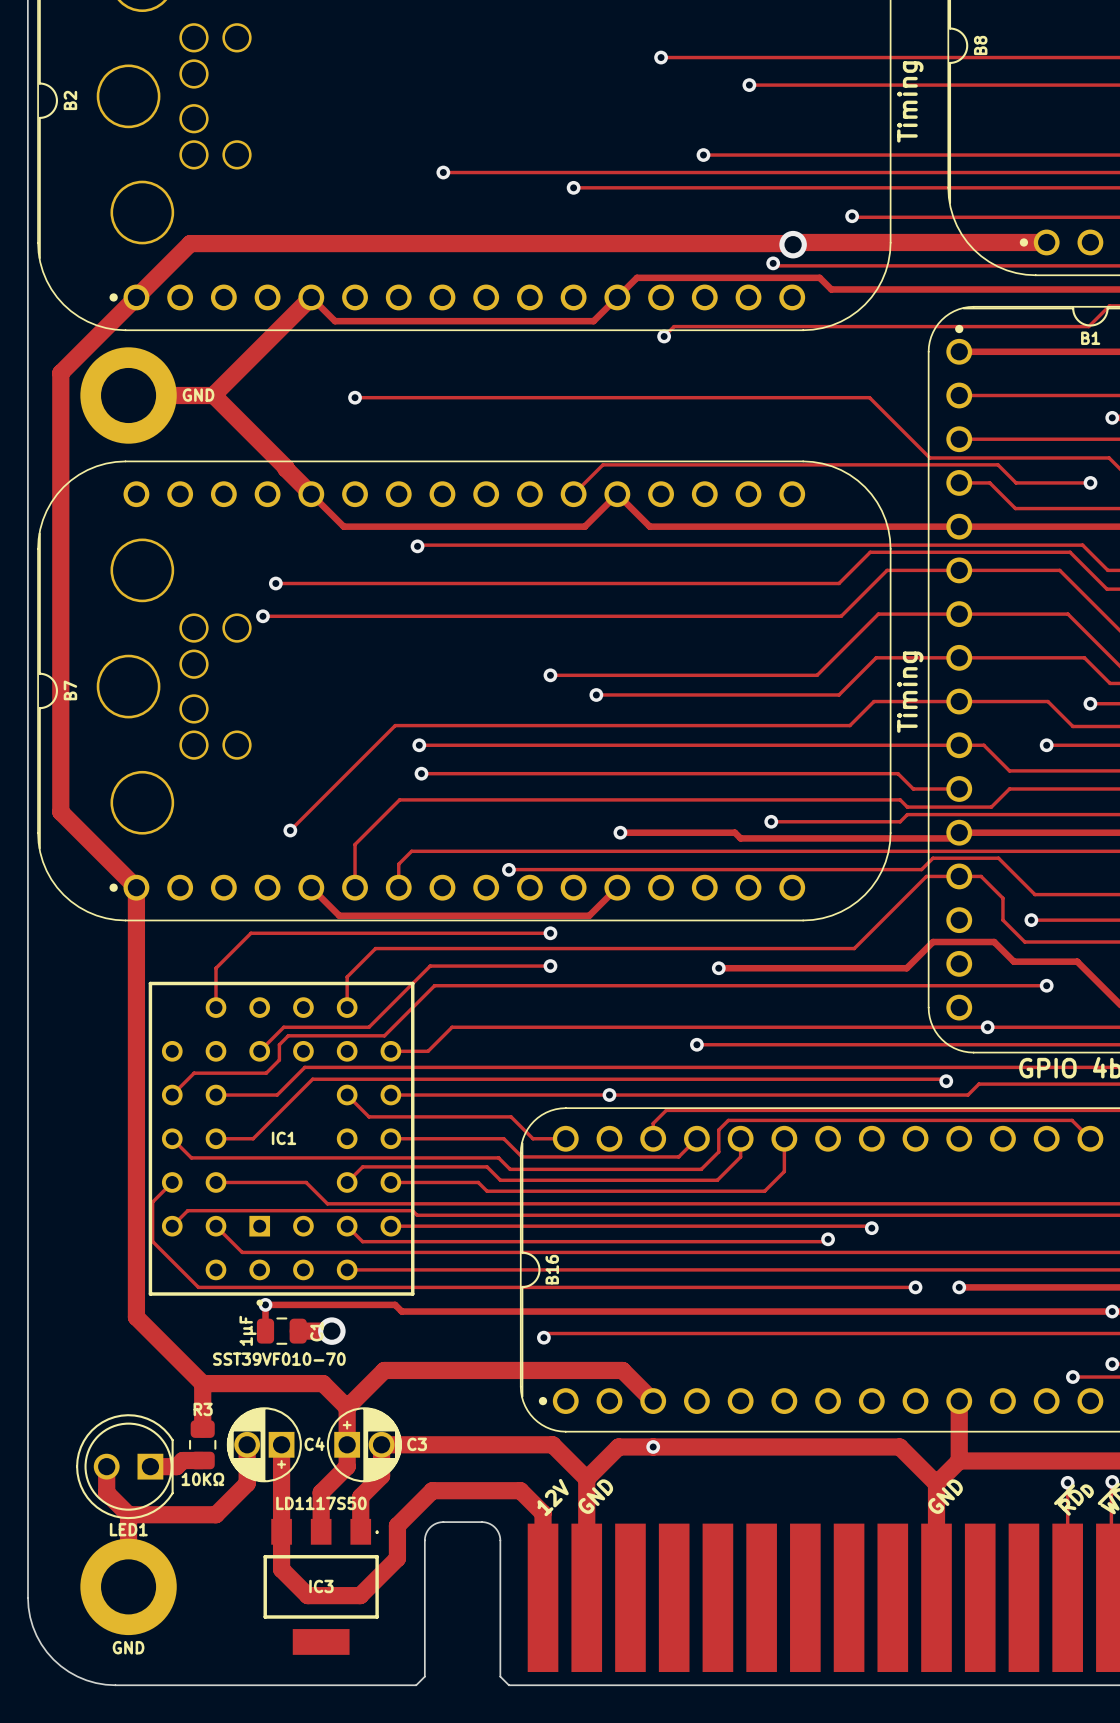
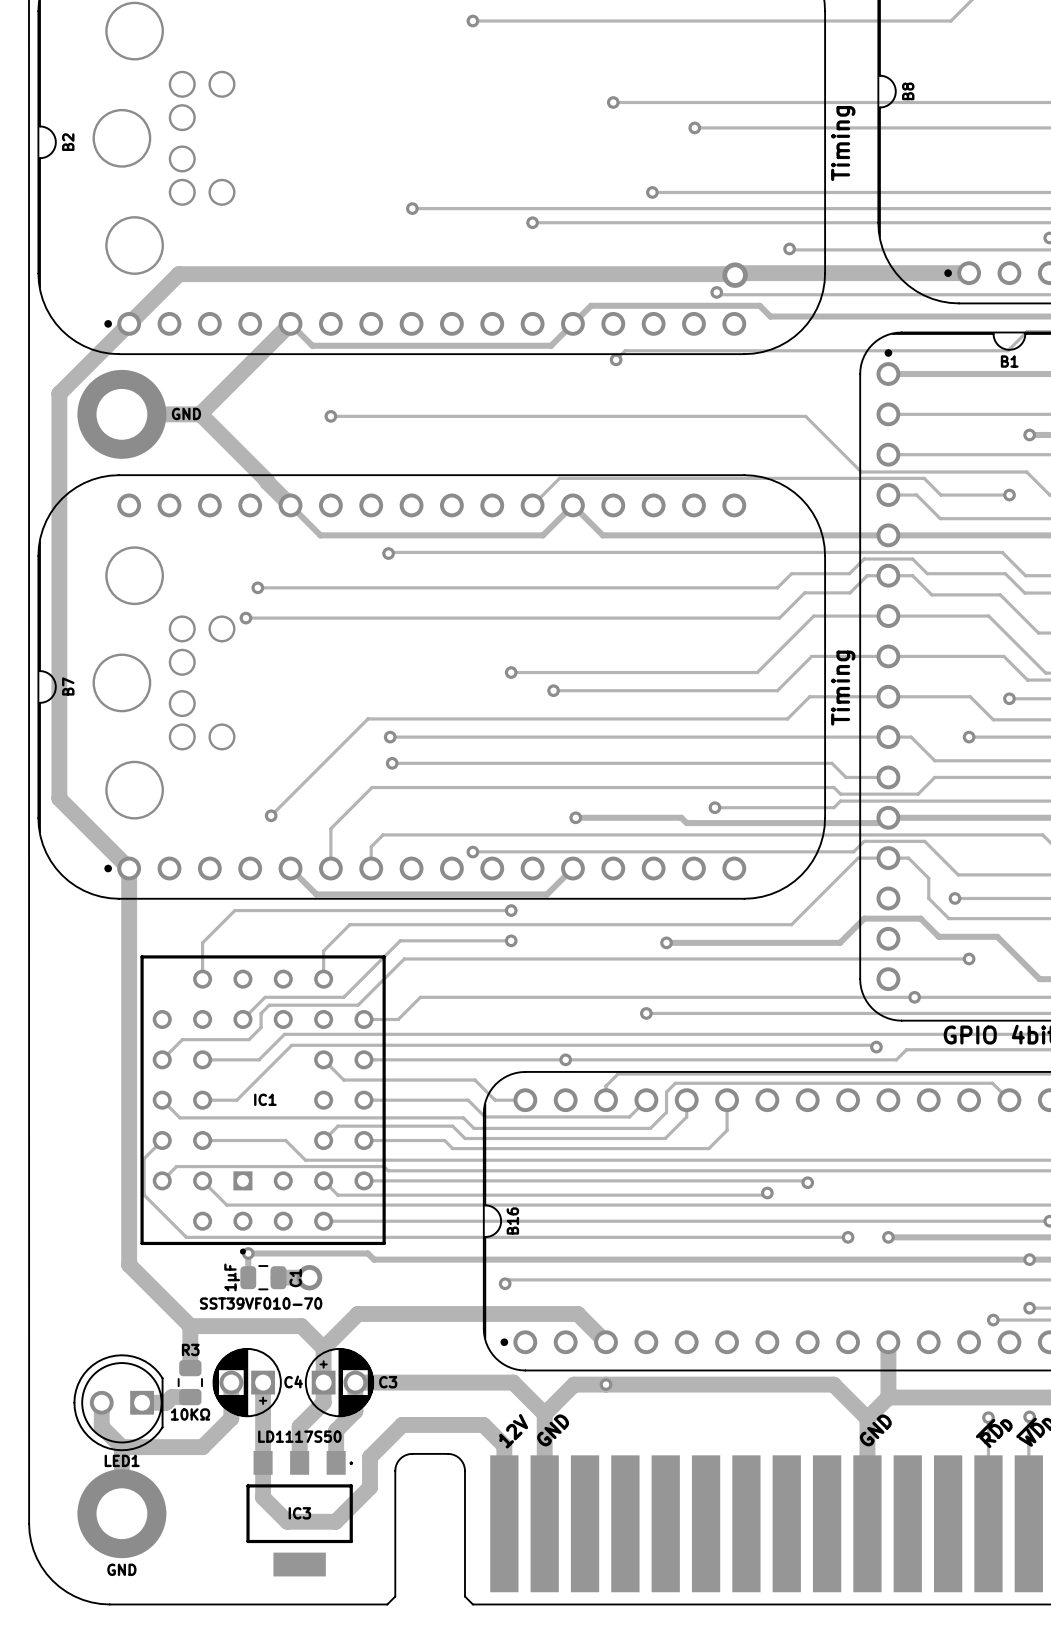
track: (933, 552) (870, 552) (854, 568) -> (864, 559) (849, 573) (791, 573)
track: (985, 552) (1070, 552) (1086, 568) -> (912, 559) (927, 573) (1005, 573)
track: (936, 570) (887, 570) (868, 588) -> (867, 575) (850, 592) (804, 592)
track: (985, 570) (1059, 570) (1080, 591) -> (912, 575) (931, 594) (1000, 594)

